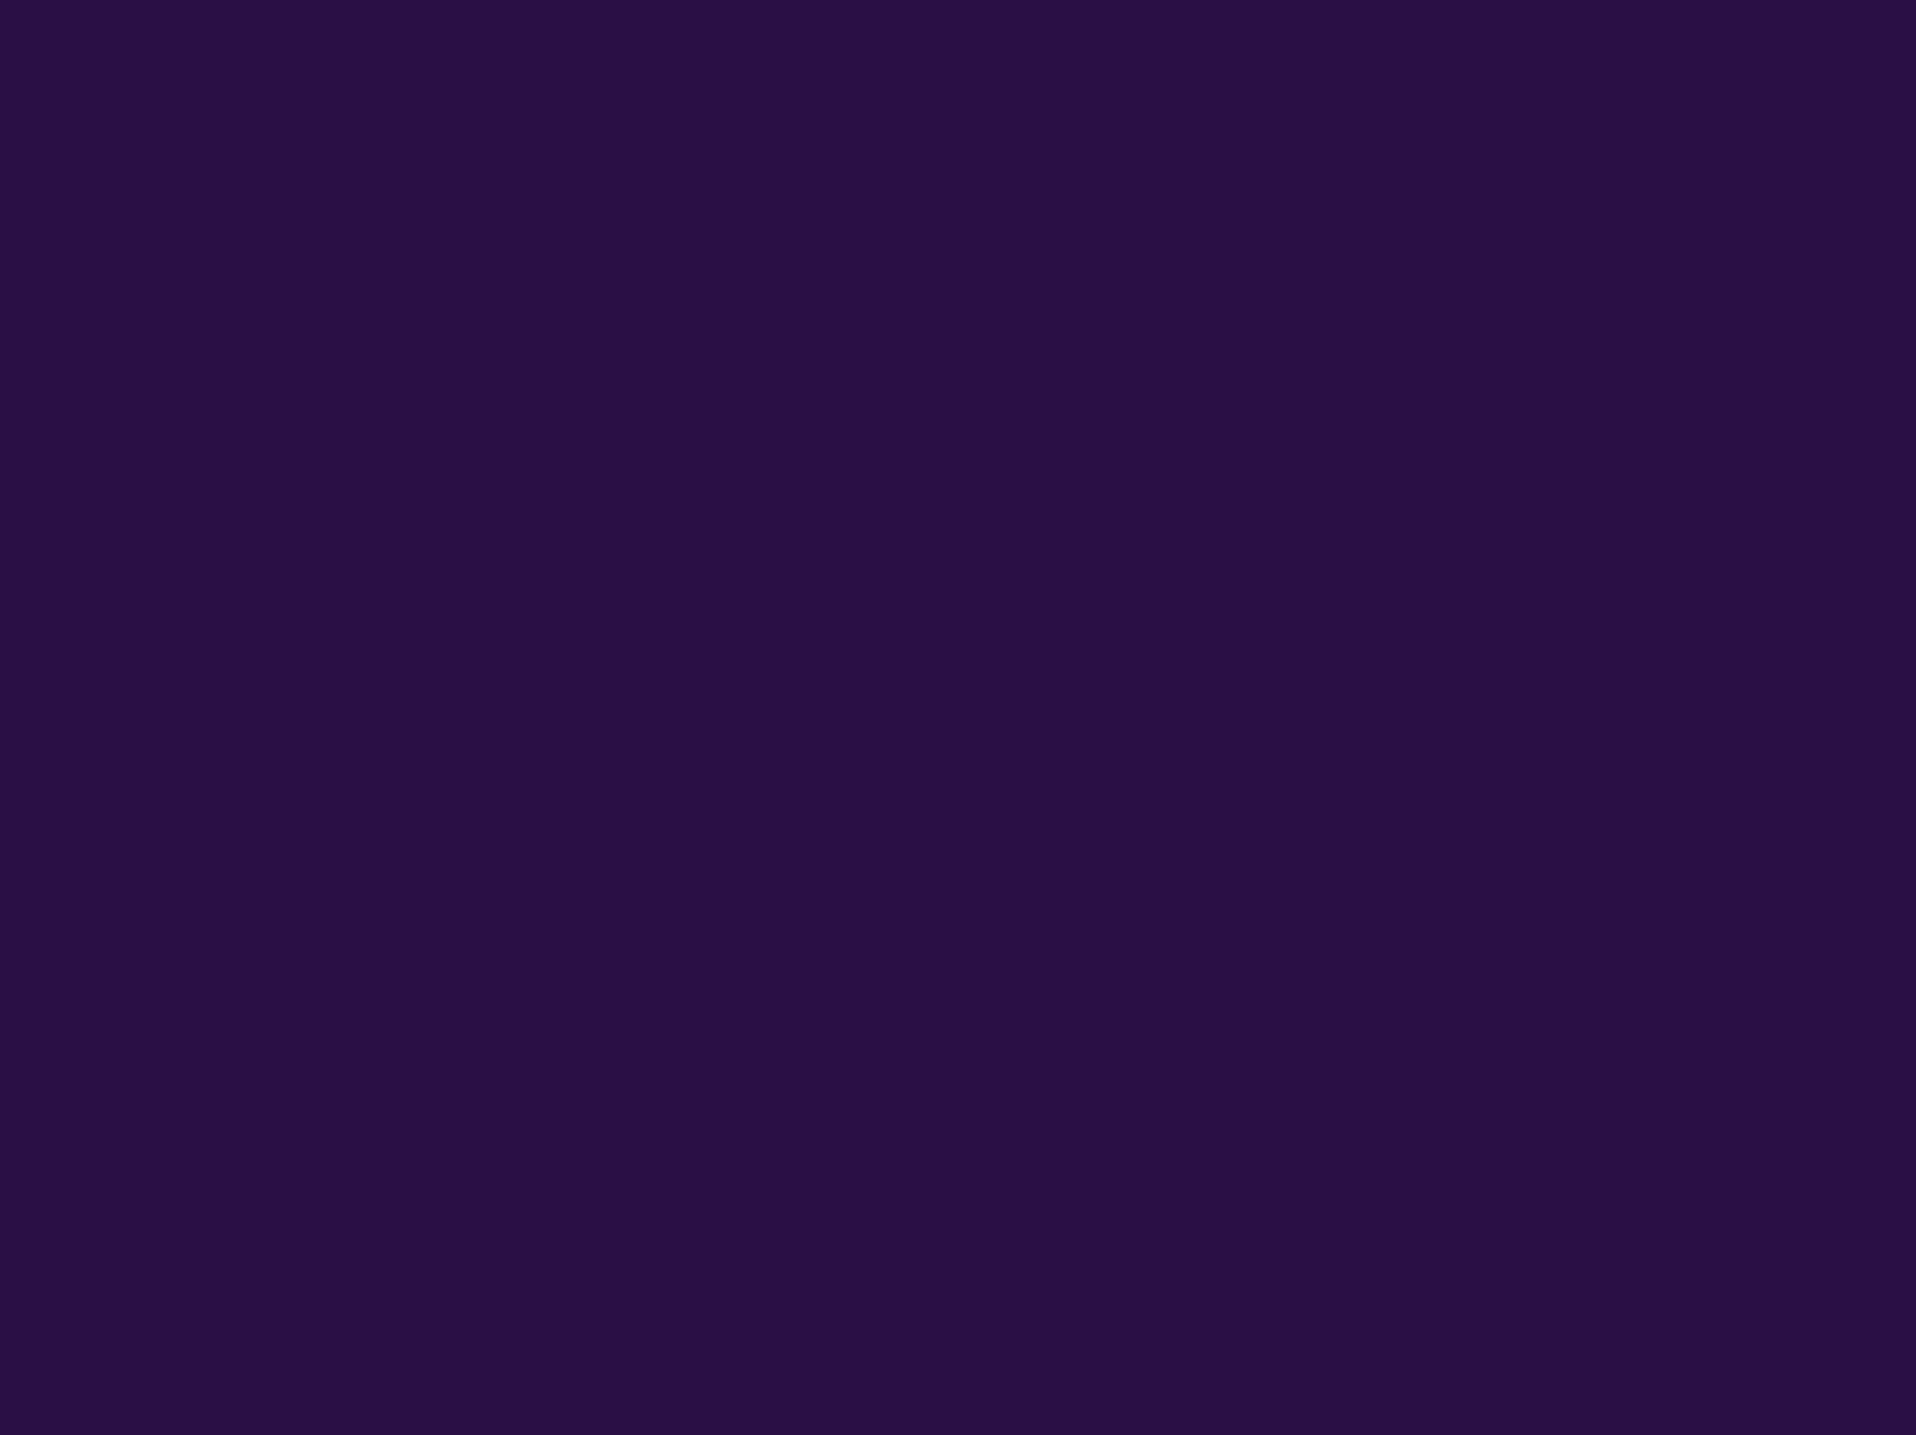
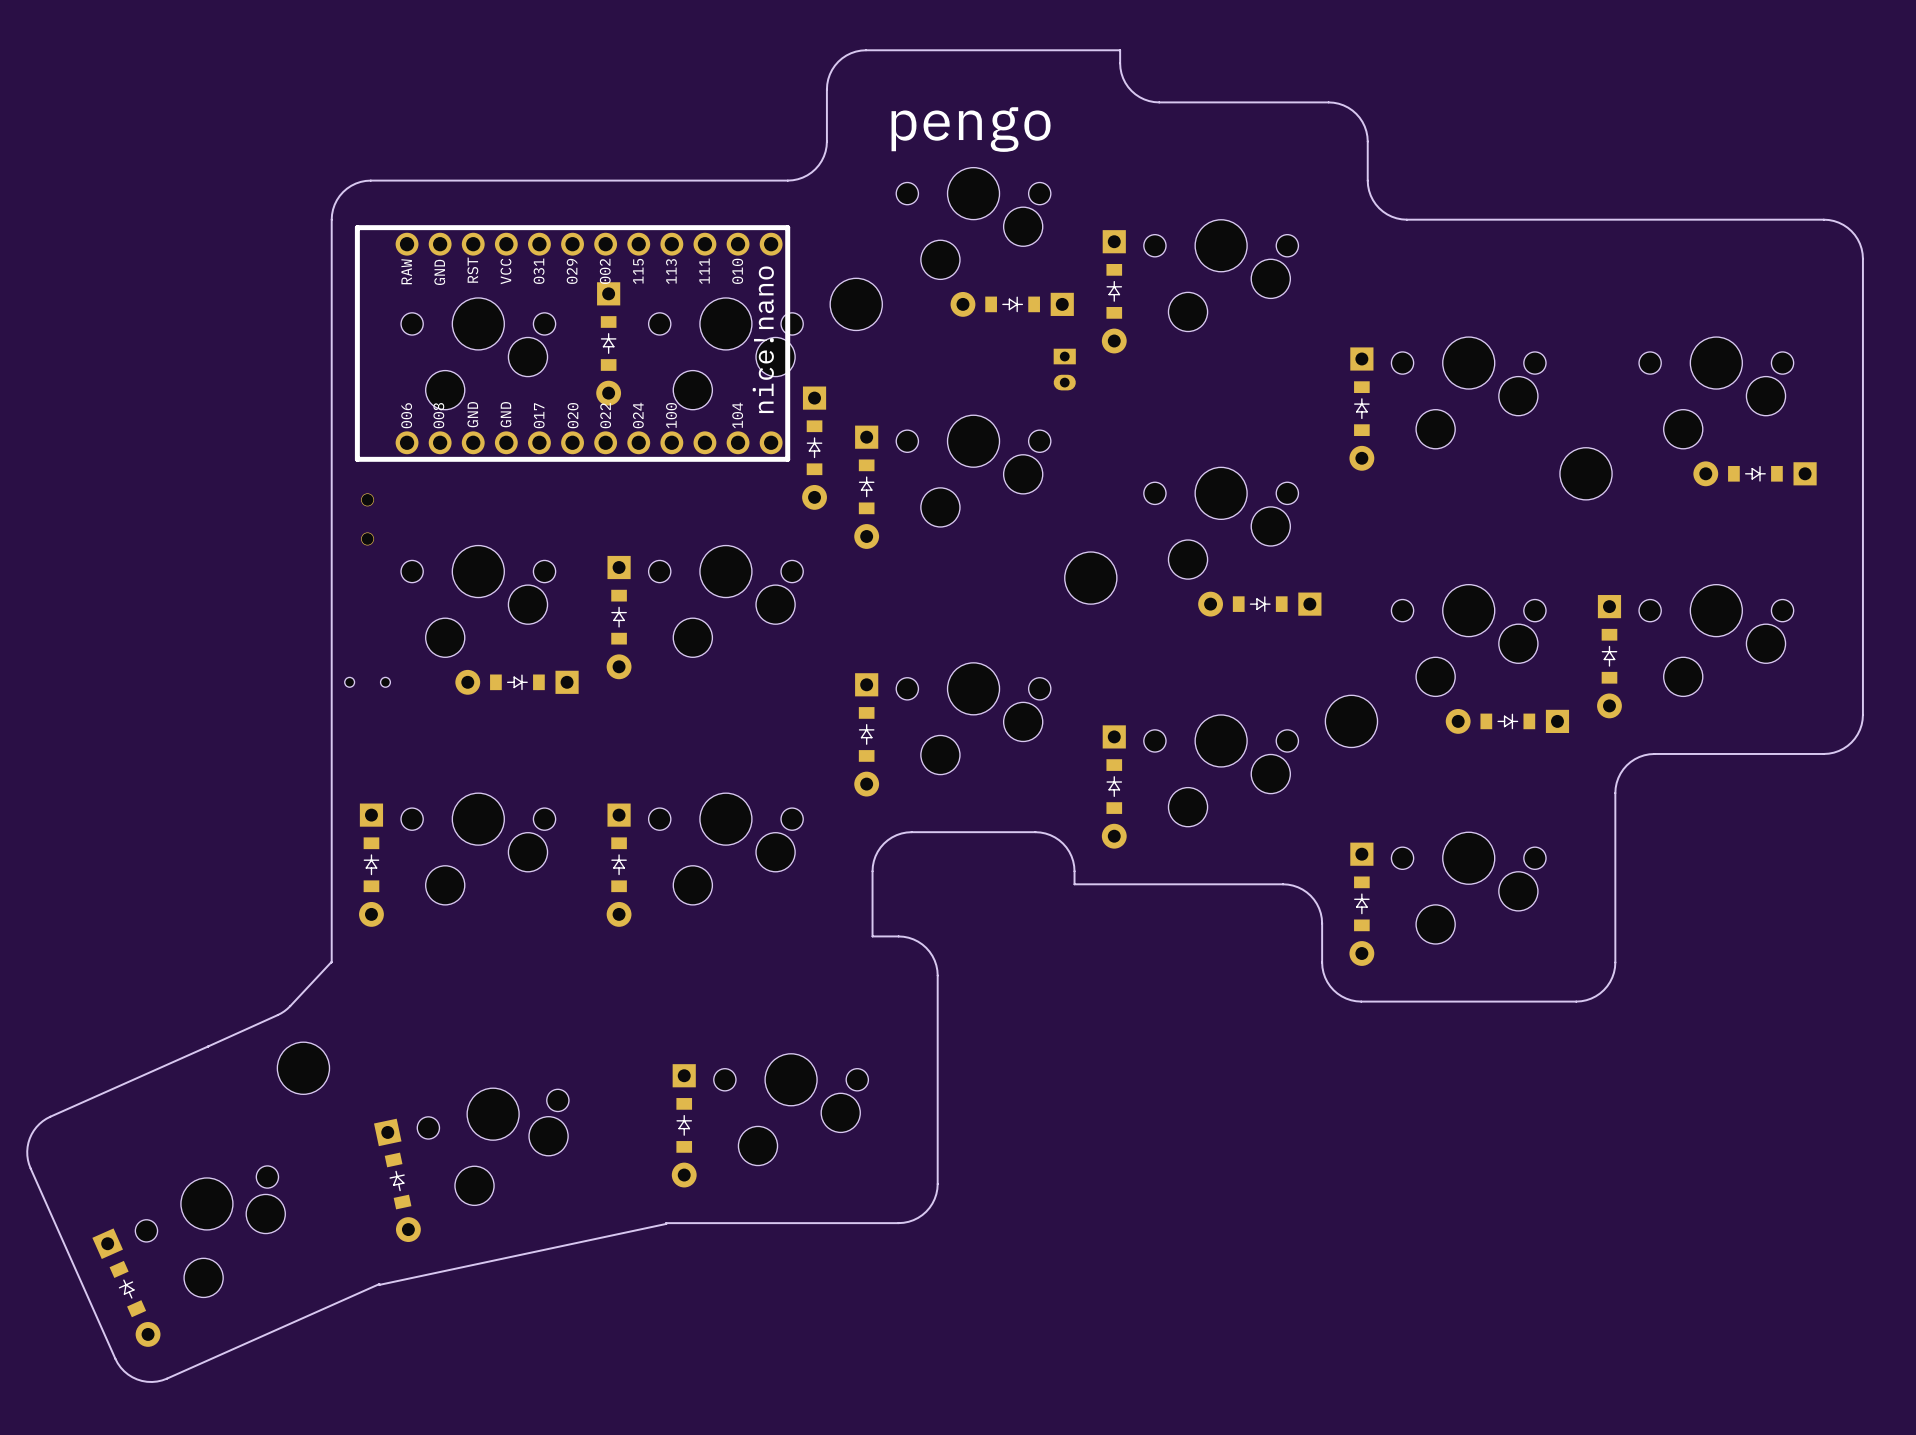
board edge: none -> (866, 50) (1120, 50) (1120, 68) (1125, 82) (1135, 94) (1149, 101) (1338, 103) (1356, 113) (1364, 126) (1367, 141) (1368, 185) (1372, 200) (1383, 211) (1401, 219) (1823, 219) (1838, 222) (1847, 227) (1859, 243) (1862, 258) (1862, 714) (1857, 734) (1847, 745) (1828, 753) (1654, 753) (1639, 756) (1626, 765) (1618, 778) (1615, 793) (1615, 967) (1610, 982) (1603, 990) (1591, 998) (1581, 1001) (1351, 1000) (1333, 990) (1325, 977) (1322, 967) (1320, 913) (1310, 895) (1297, 887) (1283, 884) (1074, 884) (1074, 866) (1069, 851) (1059, 840) (1045, 833) (911, 832) (896, 835) (883, 843) (873, 861) (872, 936) (903, 936) (918, 941) (932, 955) (937, 970) (937, 1184) (934, 1198) (922, 1215) (908, 1221) (898, 1223) (666, 1223) (379, 1284) (167, 1378) (152, 1381) (132, 1377) (120, 1367) (115, 1358) (30, 1168) (27, 1146) (33, 1130) (46, 1118) (281, 1013) (331, 962) (331, 219) (336, 200) (351, 185) (370, 180) (797, 179) (815, 169) (825, 151) (827, 84) (832, 69) (846, 55) (866, 50)
text: none -> pengo (971, 129)
part: none -> (973, 223)
part: none -> (1221, 275)
part: none -> (1114, 291)
part: none -> (856, 304)
part: none -> (1012, 304)
part: none -> (572, 343)
part: none -> (608, 343)
part: none -> (478, 353)
part: none -> (725, 353)
part: none -> (1064, 369)
part: none -> (1468, 392)
part: none -> (1716, 392)
part: none -> (1361, 409)
part: none -> (814, 448)
part: none -> (973, 471)
part: none -> (1586, 473)
part: none -> (1755, 473)
part: none -> (866, 487)
part: none -> (367, 519)
part: none -> (1221, 523)
part: none -> (1090, 578)
part: none -> (478, 601)
part: none -> (725, 601)
part: none -> (1259, 604)
part: none -> (619, 617)
part: none -> (1468, 640)
part: none -> (1716, 640)
part: none -> (1609, 656)
part: none -> (367, 682)
part: none -> (517, 682)
part: none -> (973, 718)
part: none -> (1351, 721)
part: none -> (1507, 721)
part: none -> (866, 734)
part: none -> (1221, 770)
part: none -> (1114, 786)
part: none -> (478, 849)
part: none -> (725, 849)
part: none -> (371, 865)
part: none -> (619, 865)
part: none -> (1468, 888)
part: none -> (1361, 904)
part: none -> (303, 1068)
part: none -> (791, 1109)
part: none -> (684, 1125)
part: none -> (493, 1146)
part: none -> (397, 1180)
part: none -> (210, 1231)
part: none -> (126, 1287)

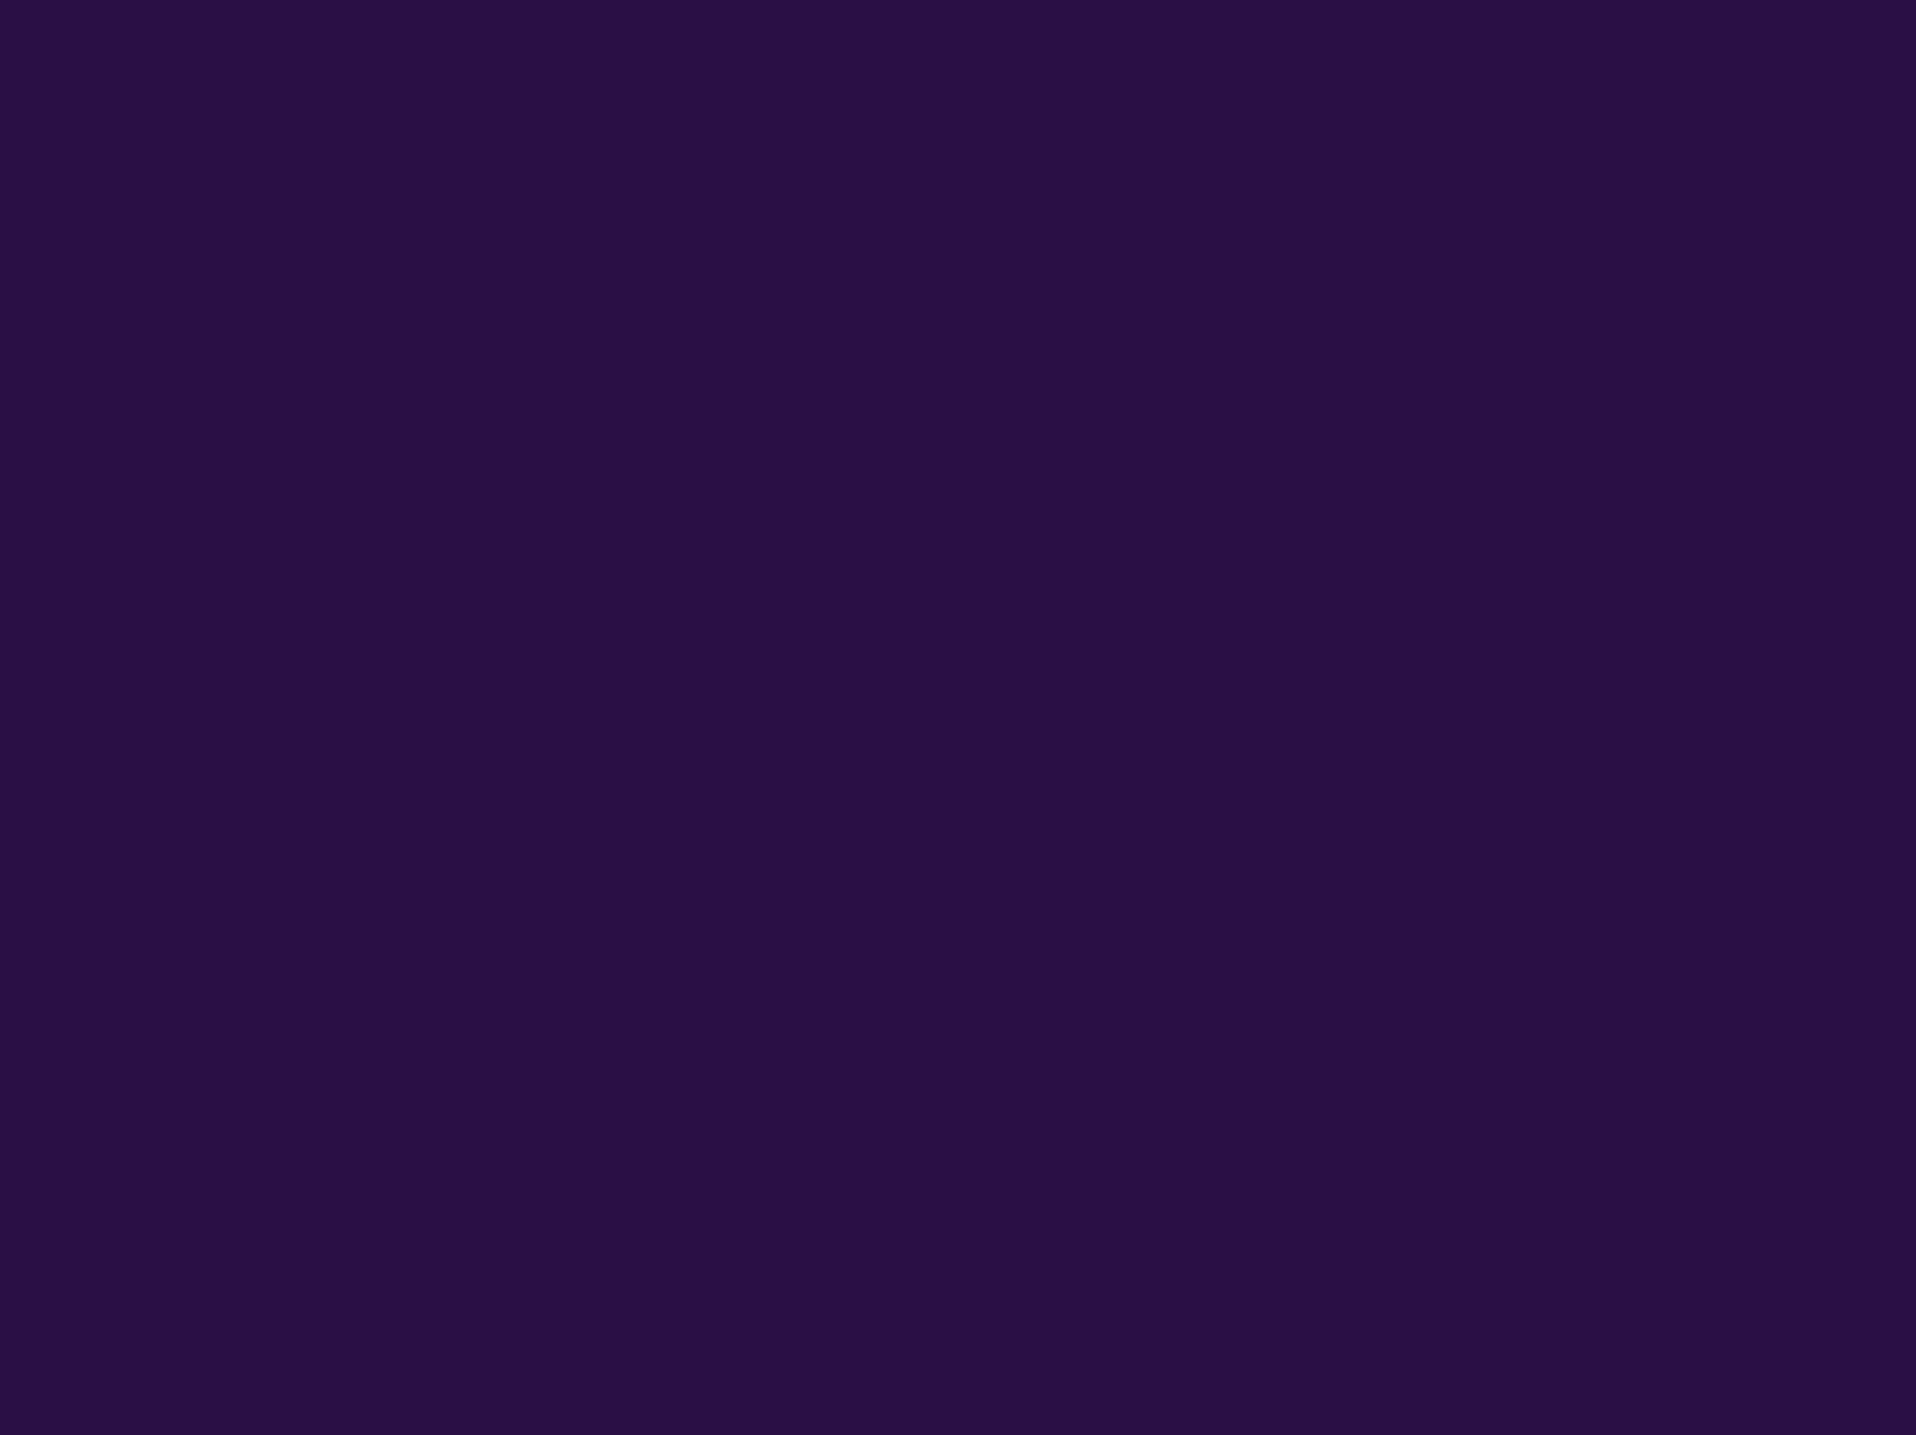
board edge: (866, 50) (1120, 50) (1120, 68) (1125, 82) (1135, 94) (1149, 101) (1338, 103) (1356, 113) (1364, 126) (1367, 141) (1368, 185) (1372, 200) (1383, 211) (1401, 219) (1823, 219) (1838, 222) (1847, 227) (1859, 243) (1862, 258) (1862, 714) (1857, 734) (1847, 745) (1828, 753) (1654, 753) (1639, 756) (1626, 765) (1618, 778) (1615, 793) (1615, 967) (1610, 982) (1603, 990) (1591, 998) (1581, 1001) (1351, 1000) (1333, 990) (1325, 977) (1322, 967) (1320, 913) (1310, 895) (1297, 887) (1283, 884) (1074, 884) (1074, 866) (1069, 851) (1059, 840) (1045, 833) (911, 832) (896, 835) (883, 843) (873, 861) (872, 936) (903, 936) (918, 941) (932, 955) (937, 970) (937, 1184) (934, 1198) (922, 1215) (908, 1221) (898, 1223) (666, 1223) (379, 1284) (167, 1378) (152, 1381) (132, 1377) (120, 1367) (115, 1358) (30, 1168) (27, 1146) (33, 1130) (46, 1118) (281, 1013) (331, 962) (331, 219) (336, 200) (351, 185) (370, 180) (797, 179) (815, 169) (825, 151) (827, 84) (832, 69) (846, 55) (866, 50) -> none
text: pengo (971, 129) -> none
part: (973, 223) -> none
part: (1221, 275) -> none
part: (1114, 291) -> none
part: (856, 304) -> none
part: (1012, 304) -> none
part: (572, 343) -> none
part: (608, 343) -> none
part: (478, 353) -> none
part: (725, 353) -> none
part: (1064, 369) -> none
part: (1468, 392) -> none
part: (1716, 392) -> none
part: (1361, 409) -> none
part: (814, 448) -> none
part: (973, 471) -> none
part: (1586, 473) -> none
part: (1755, 473) -> none
part: (866, 487) -> none
part: (367, 519) -> none
part: (1221, 523) -> none
part: (1090, 578) -> none
part: (478, 601) -> none
part: (725, 601) -> none
part: (1259, 604) -> none
part: (619, 617) -> none
part: (1468, 640) -> none
part: (1716, 640) -> none
part: (1609, 656) -> none
part: (367, 682) -> none
part: (517, 682) -> none
part: (973, 718) -> none
part: (1351, 721) -> none
part: (1507, 721) -> none
part: (866, 734) -> none
part: (1221, 770) -> none
part: (1114, 786) -> none
part: (478, 849) -> none
part: (725, 849) -> none
part: (371, 865) -> none
part: (619, 865) -> none
part: (1468, 888) -> none
part: (1361, 904) -> none
part: (303, 1068) -> none
part: (791, 1109) -> none
part: (684, 1125) -> none
part: (493, 1146) -> none
part: (397, 1180) -> none
part: (210, 1231) -> none
part: (126, 1287) -> none

